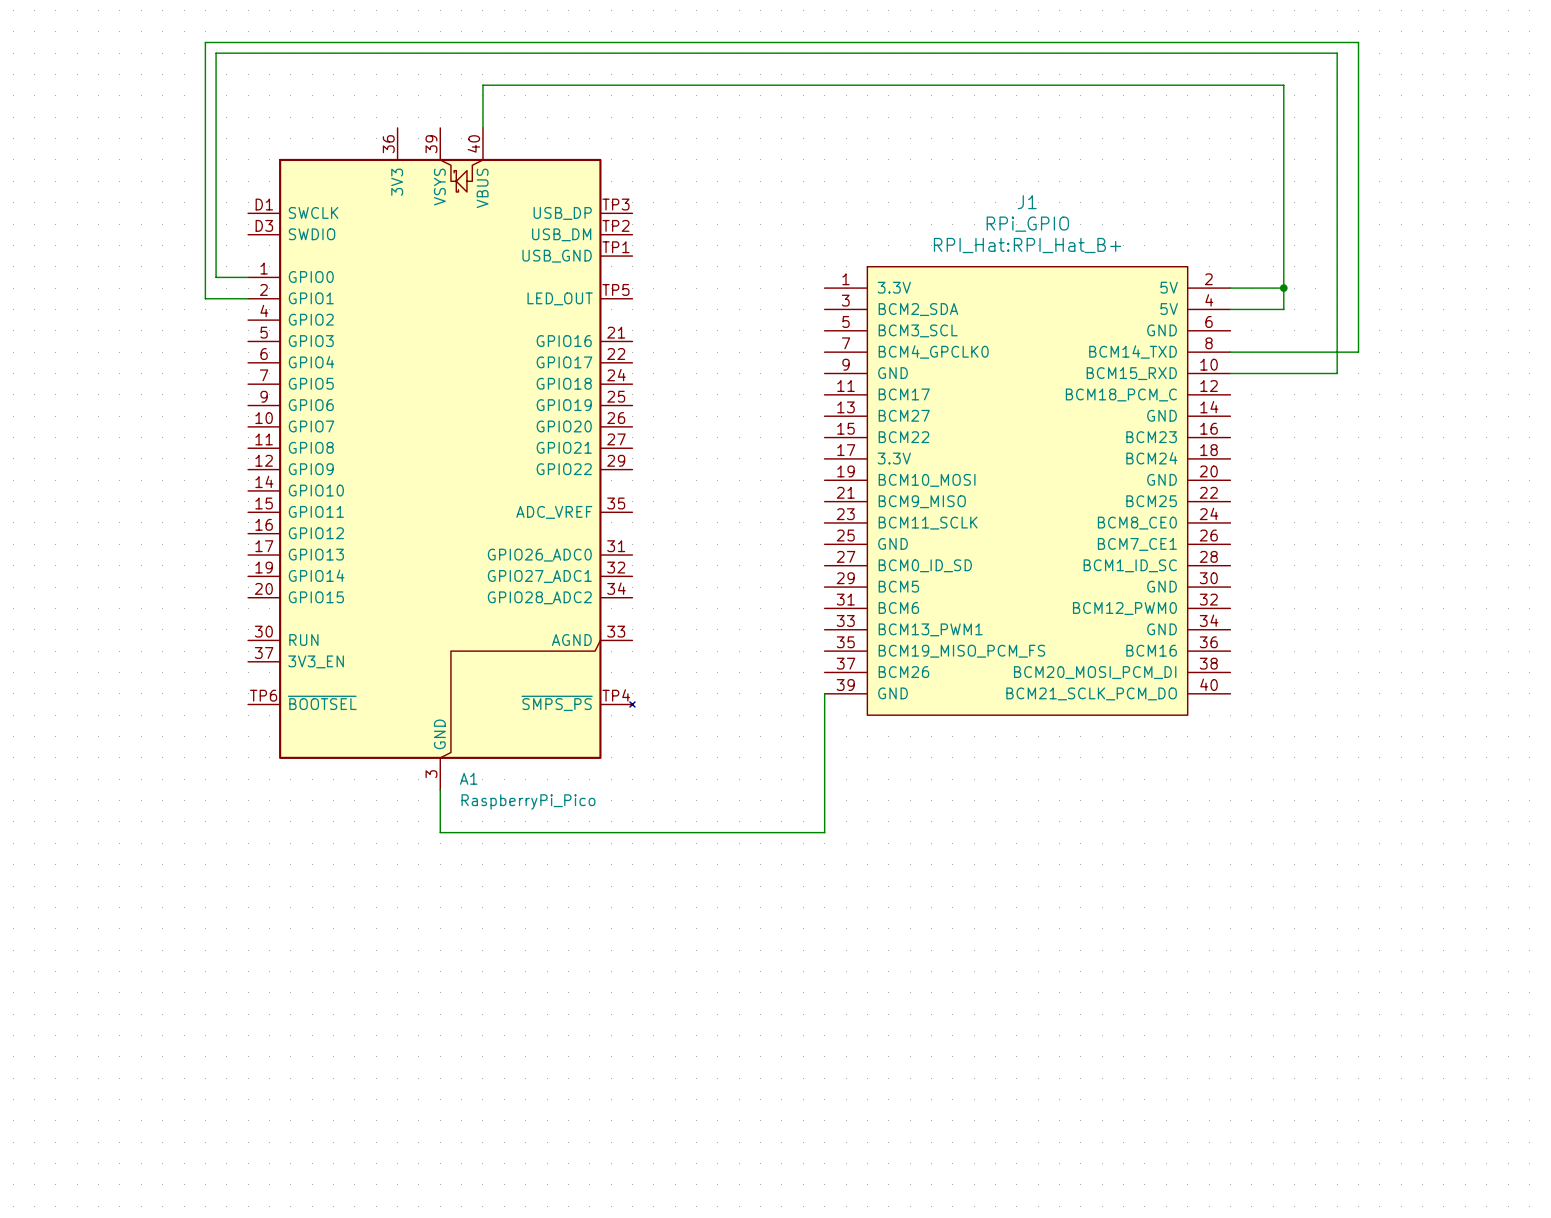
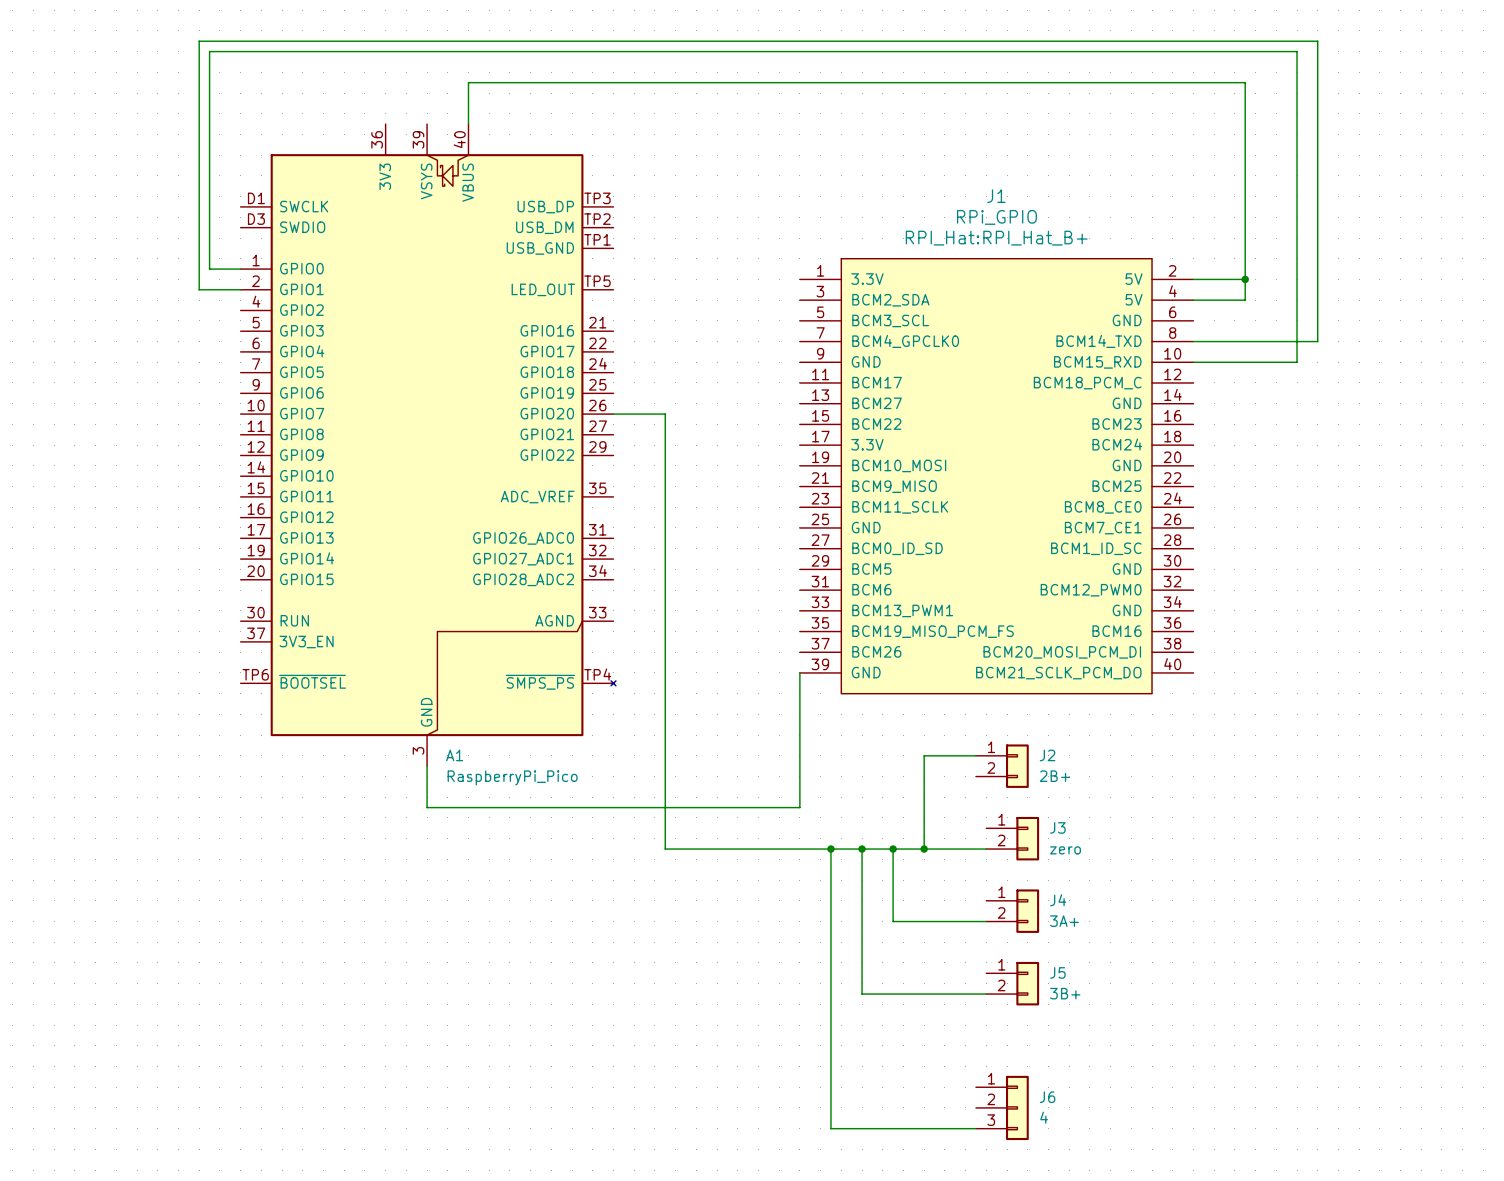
wire: none -> (613, 414) (665, 414) (665, 849) (986, 849)
wire: none -> (975, 755) (924, 755) (924, 849)
J2: none -> 2B+ (1002, 766)
J3: none -> zero (1012, 838)
wire: none -> (830, 849) (830, 1128) (975, 1128)
junction: none -> (830, 849)
wire: none -> (862, 849) (862, 994) (986, 994)
junction: none -> (862, 849)
wire: none -> (893, 849) (893, 921) (986, 921)
junction: none -> (893, 849)
junction: none -> (924, 849)
J4: none -> 3A+ (1012, 911)
J5: none -> 3B+ (1012, 983)
J6: none -> 4 (1002, 1107)

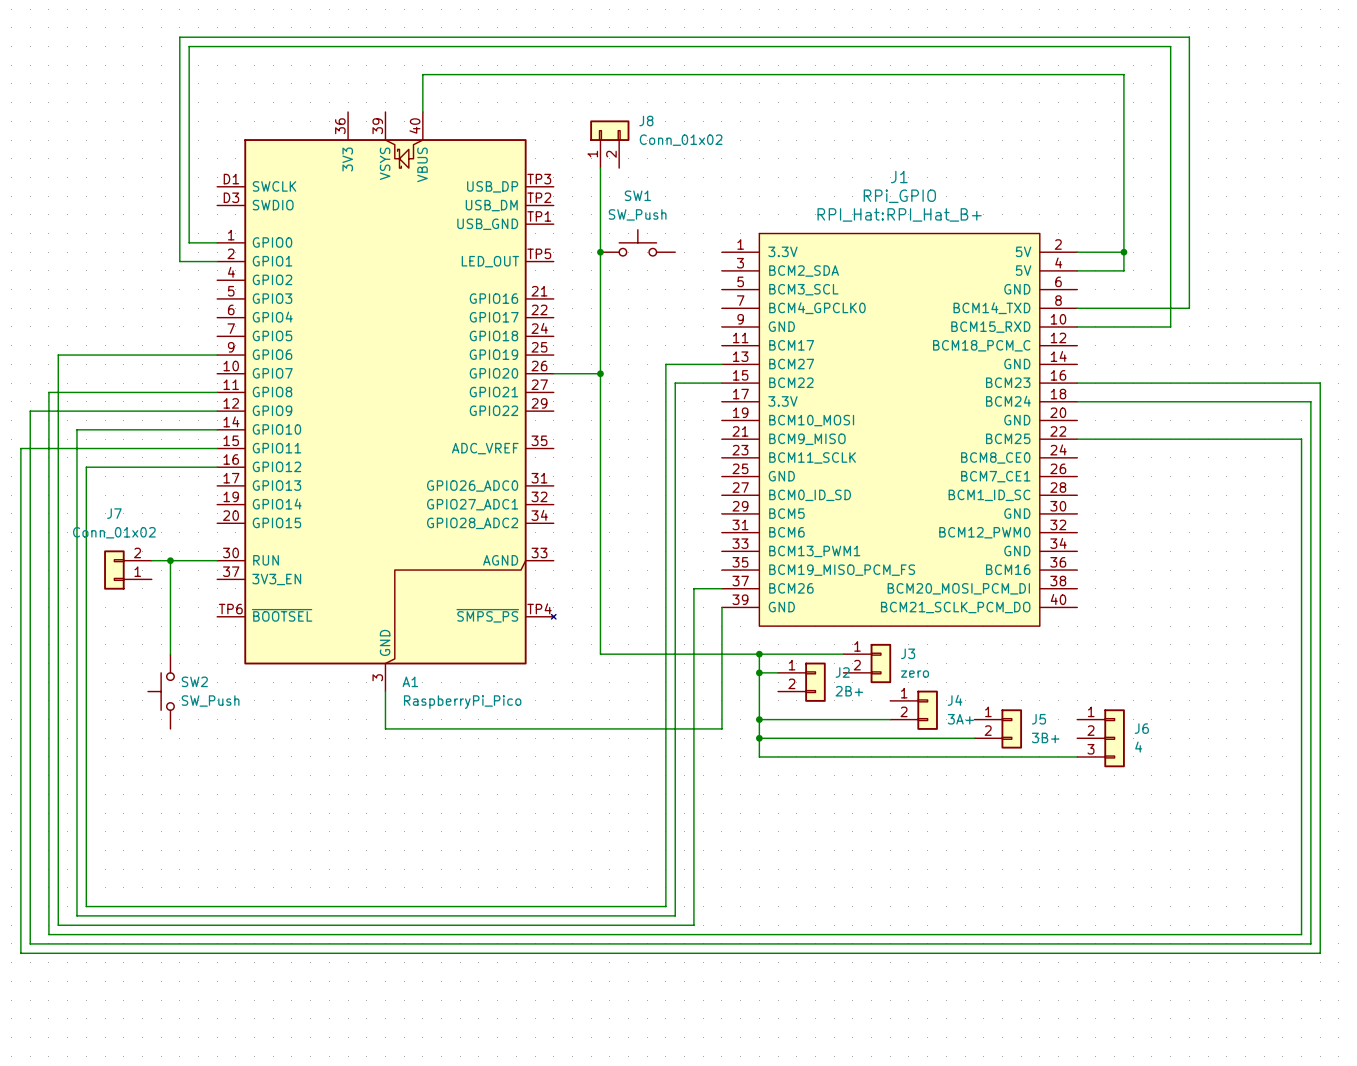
J8: none -> Conn_01x02 (609, 144)
wire: none -> (600, 168) (600, 373)
SW1: none -> SW_Push (637, 242)
junction: none -> (600, 252)
wire: none -> (217, 355) (58, 355) (58, 925) (693, 925) (693, 588) (721, 588)
wire: none -> (721, 364) (665, 364) (665, 906) (86, 906) (86, 467) (217, 467)
junction: none -> (600, 373)
wire: none -> (721, 383) (675, 383) (675, 915) (76, 915) (76, 429) (217, 429)
wire: none -> (1077, 383) (1320, 383) (1320, 953) (20, 953) (20, 448) (217, 448)
wire: none -> (217, 392) (48, 392) (48, 934) (1301, 934) (1301, 439) (1077, 439)
wire: none -> (1077, 401) (1310, 401) (1310, 943) (30, 943) (30, 411) (217, 411)
wire: none -> (151, 560) (217, 560)
wire: none -> (170, 560) (170, 654)
junction: none -> (170, 560)
J7: none -> Conn_01x02 (127, 570)
wire: (665, 724) (665, 849) (986, 849) -> (600, 654) (843, 654)
wire: none -> (759, 654) (759, 756) (1077, 756)
junction: none -> (759, 654)
wire: none -> (759, 672) (778, 672)
junction: none -> (759, 672)
wire: (975, 755) (924, 755) (924, 849) -> none
SW2: none -> SW_Push (161, 691)
J2 position: (1002, 766) -> (801, 682)
wire: none -> (759, 719) (890, 719)
junction: none -> (759, 719)
wire: none -> (759, 738) (974, 738)
junction: none -> (759, 738)
J3 position: (1012, 838) -> (867, 663)
wire: (830, 849) (830, 1128) (975, 1128) -> none
junction: (830, 849) -> none
wire: (862, 849) (862, 994) (986, 994) -> none
junction: (862, 849) -> none
wire: (893, 849) (893, 921) (986, 921) -> none
junction: (893, 849) -> none
junction: (924, 849) -> none
J4 position: (1012, 911) -> (914, 710)
J5 position: (1012, 983) -> (998, 728)
J6 position: (1002, 1107) -> (1101, 738)

